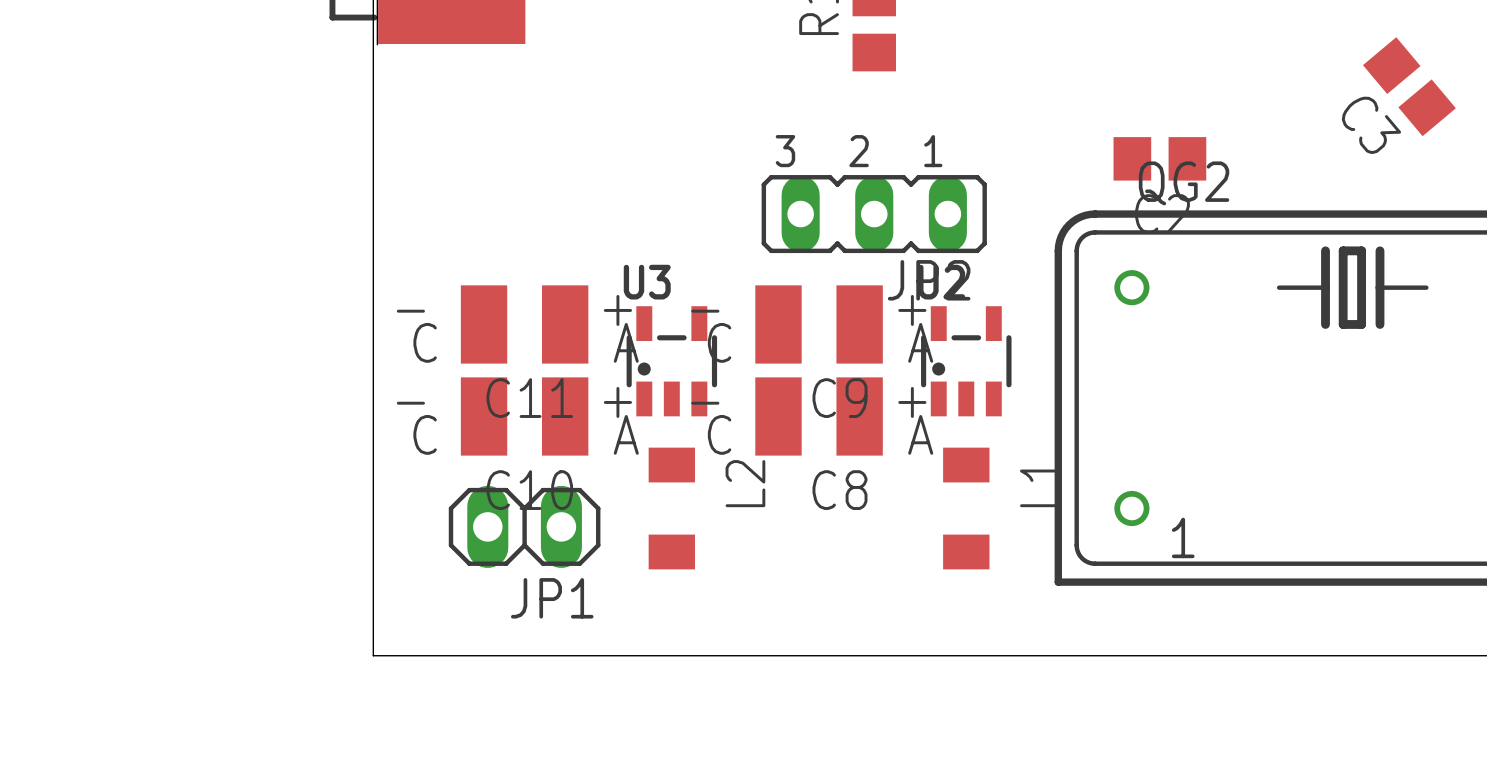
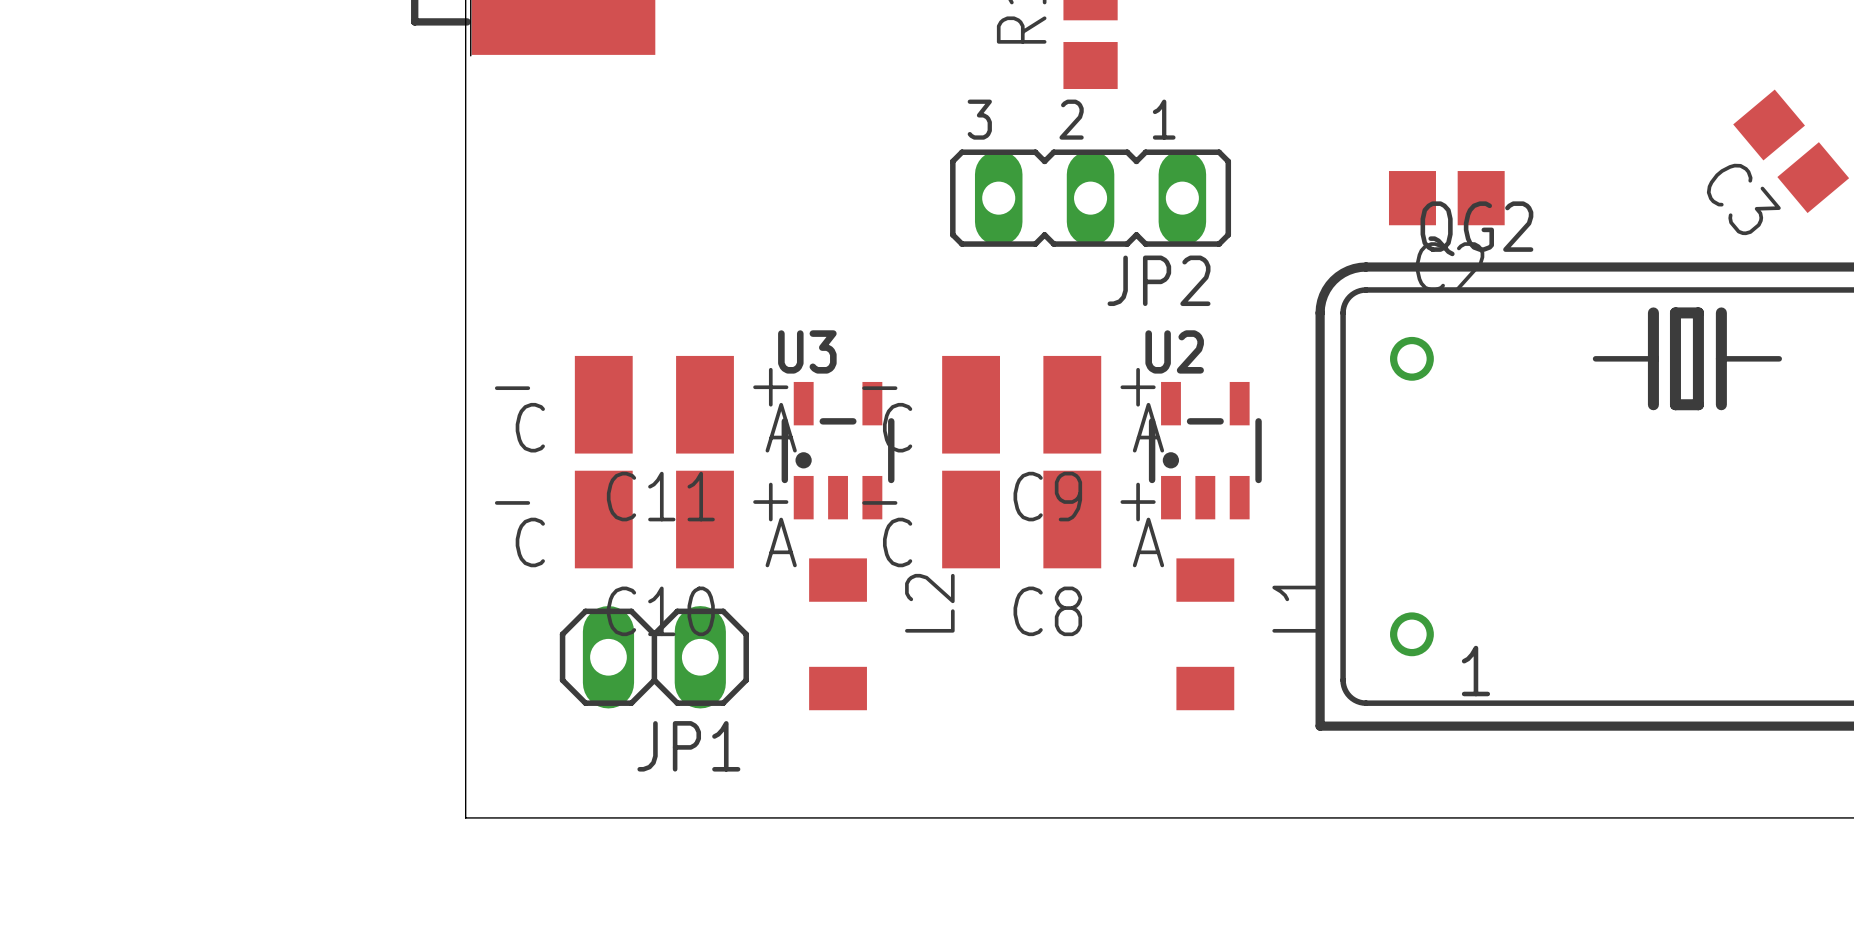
C3 position: (1409, 86) -> (1791, 151)
JP2 position: (874, 214) -> (1090, 198)

